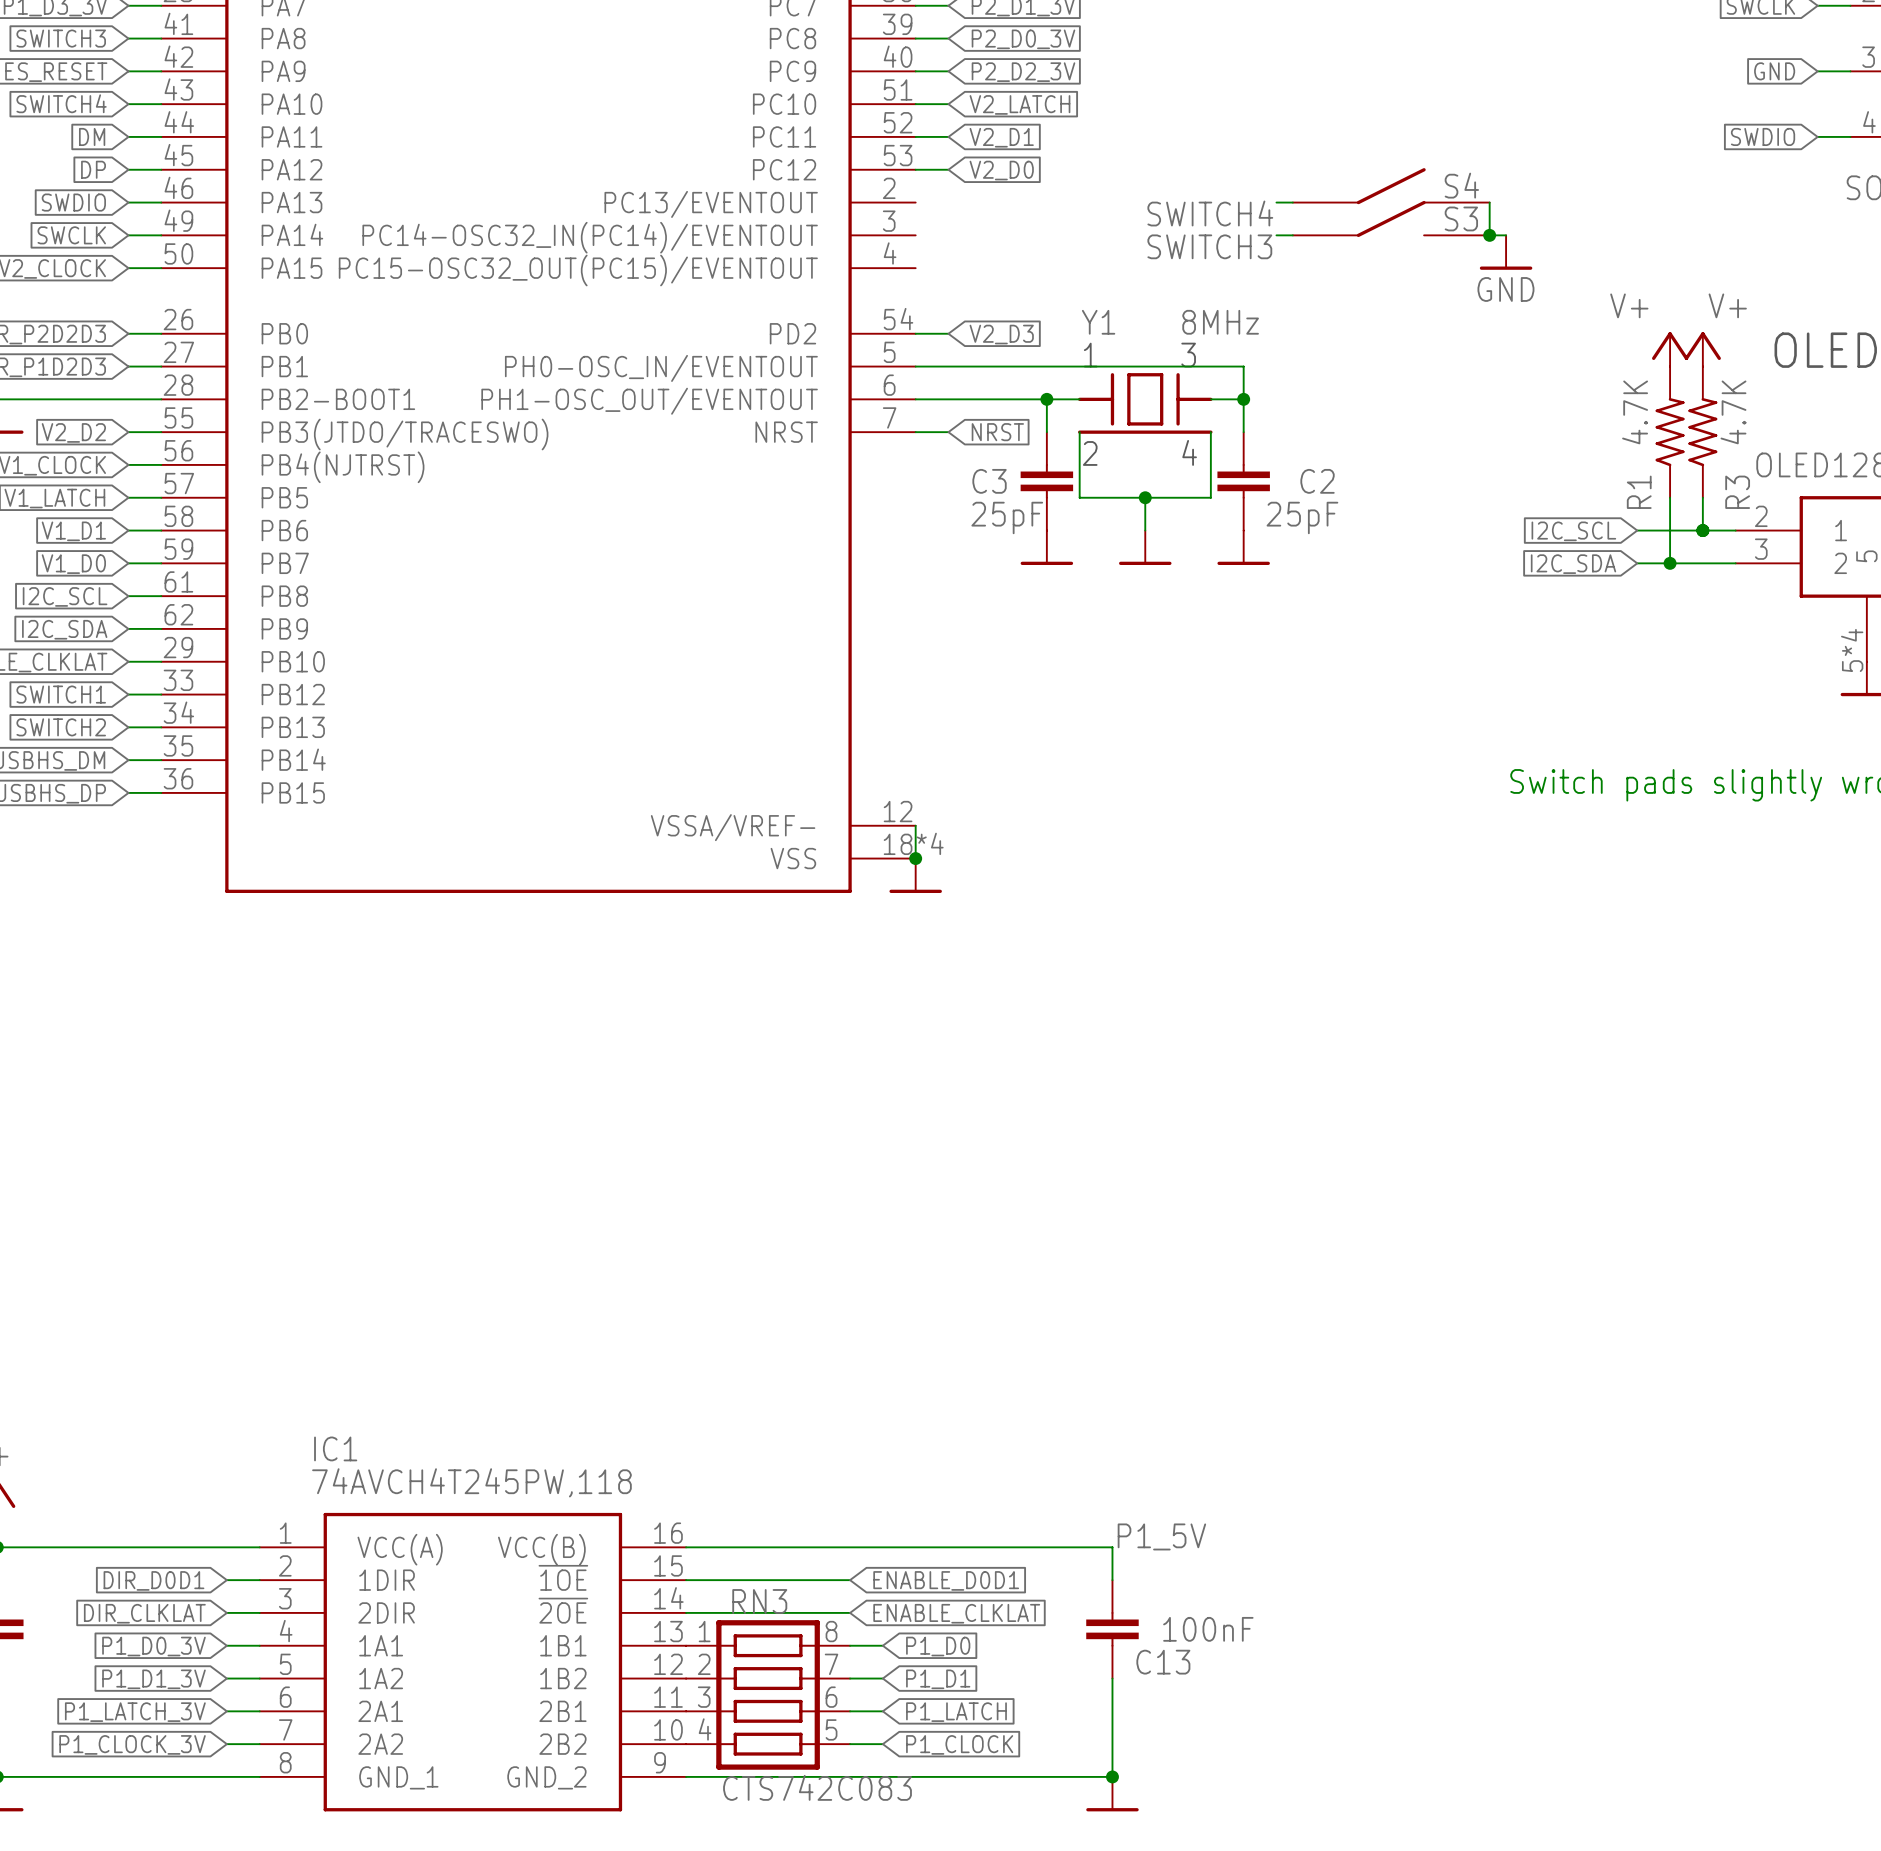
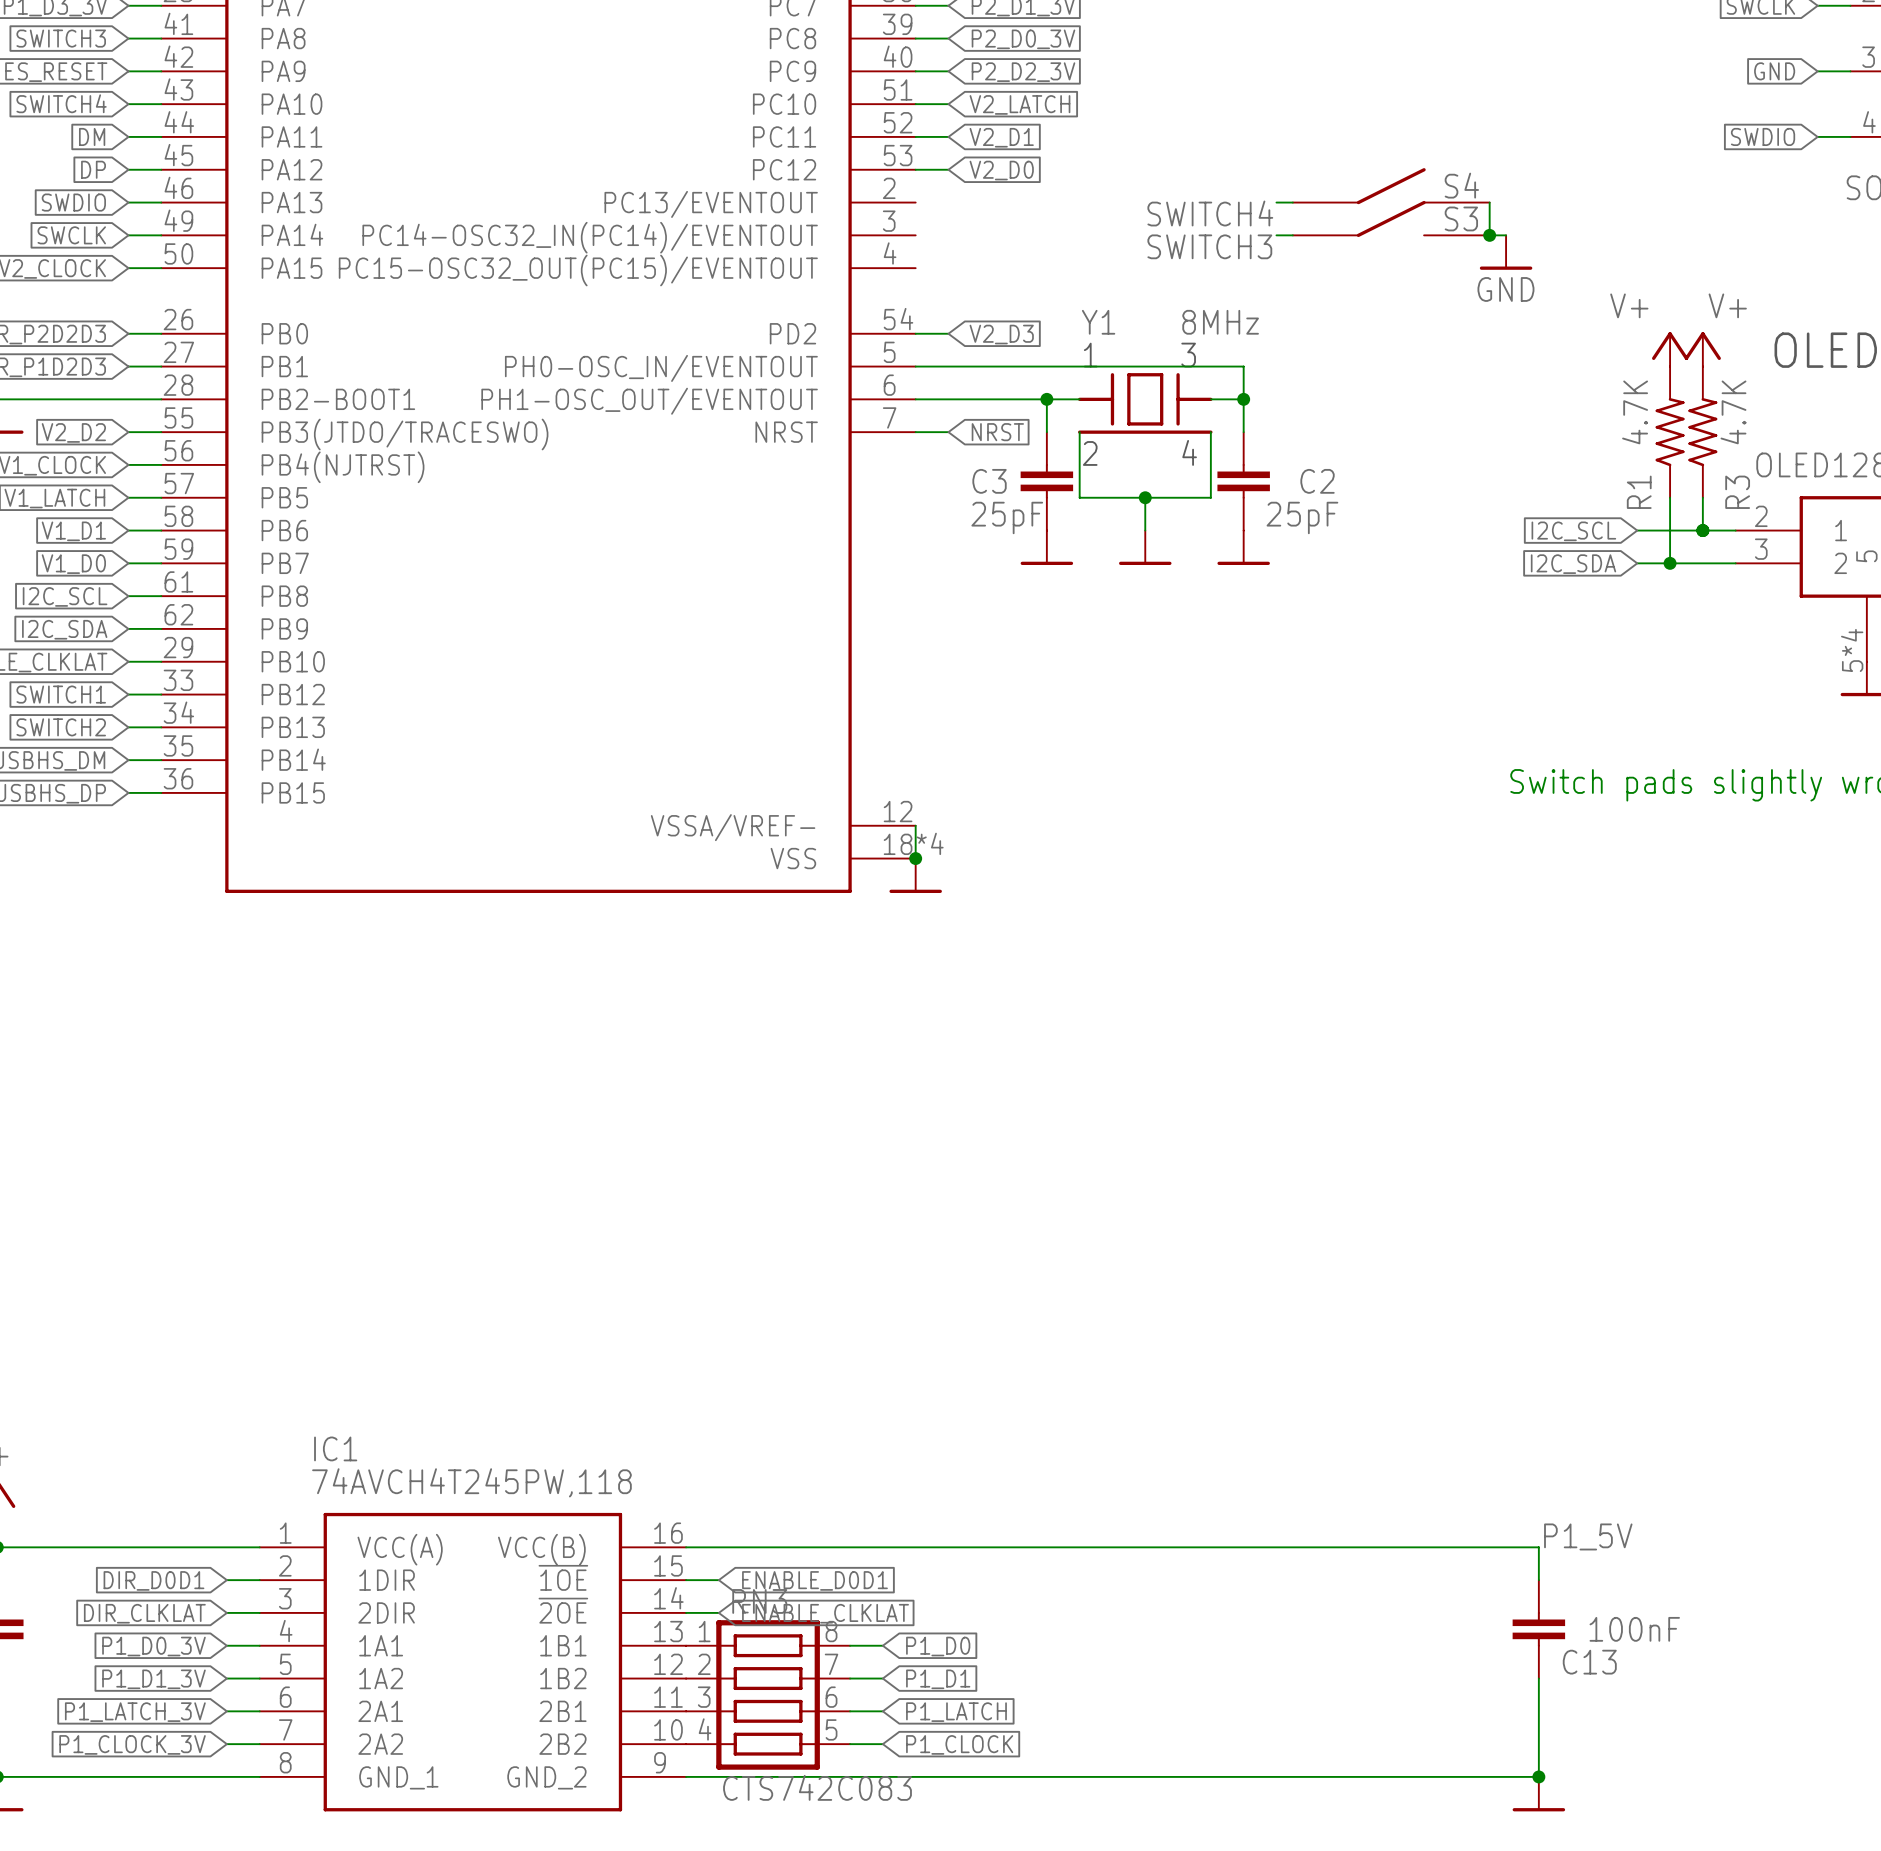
label: P1_5V (1161, 1536) -> none
label: none -> P1_5V (1588, 1536)
wire: (1112, 1547) (1112, 1580) -> (1112, 1547) (1538, 1547) (1538, 1580)
wire: (718, 1580) (850, 1580) -> none
global label position: ENABLE_D0D1 (946, 1580) -> ENABLE_D0D1 (814, 1580)
wire: (718, 1612) (850, 1612) -> none
global label position: ENABLE_CLKLAT (956, 1613) -> ENABLE_CLKLAT (825, 1613)
C13 position: (1112, 1629) -> (1538, 1629)
wire: (1112, 1678) (1112, 1776) -> (1538, 1678) (1538, 1776) (1112, 1776)
junction: (1112, 1776) -> none
junction: none -> (1538, 1776)
power symbol: (1112, 1794) -> none
power symbol: none -> (1538, 1794)

